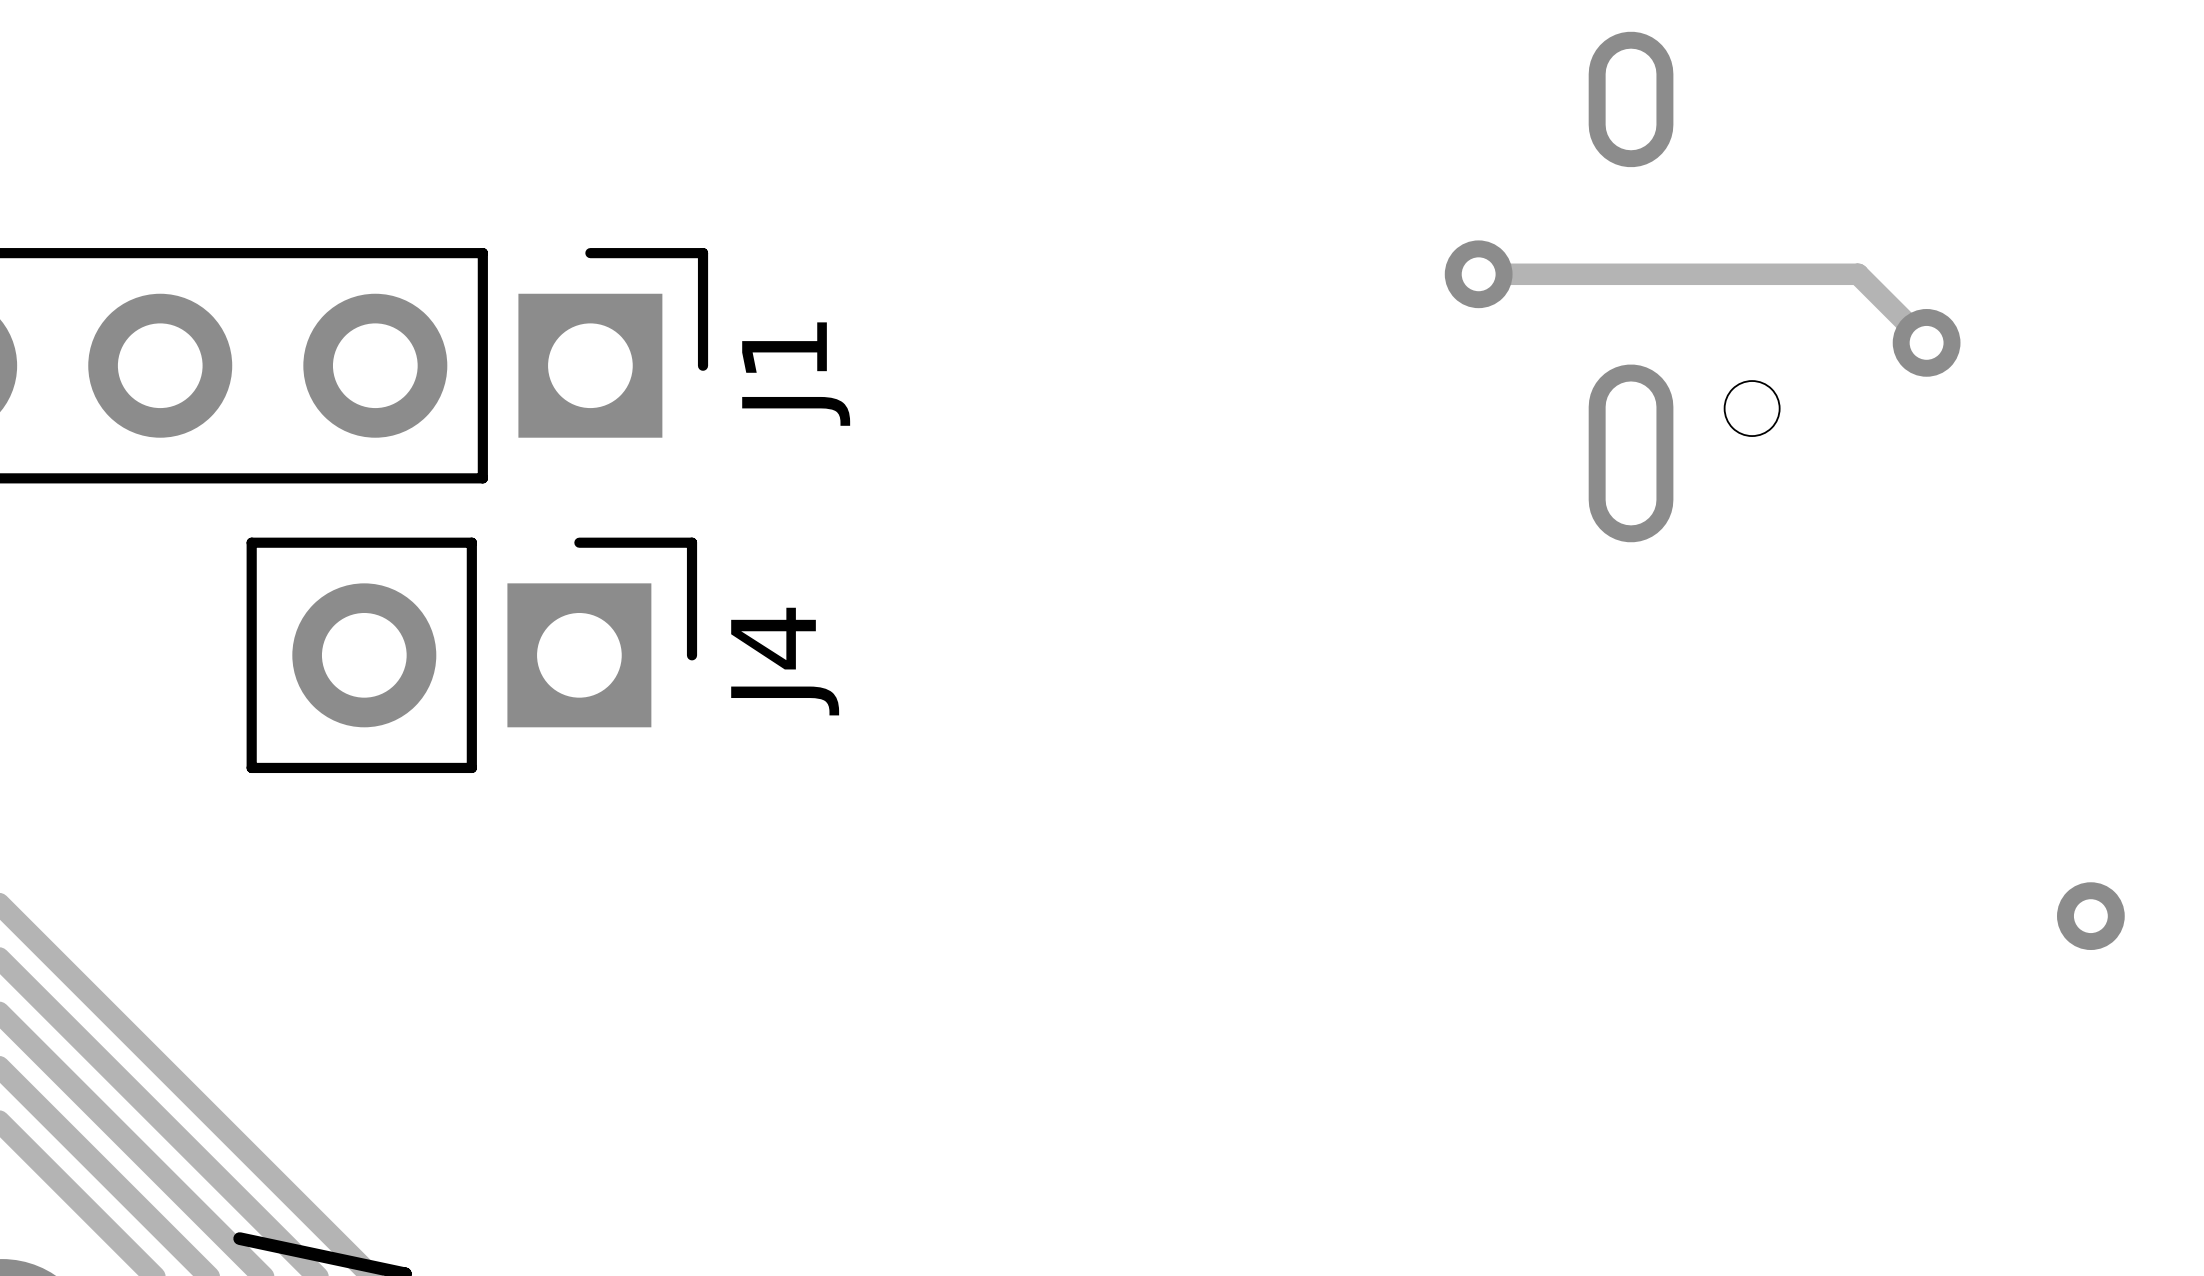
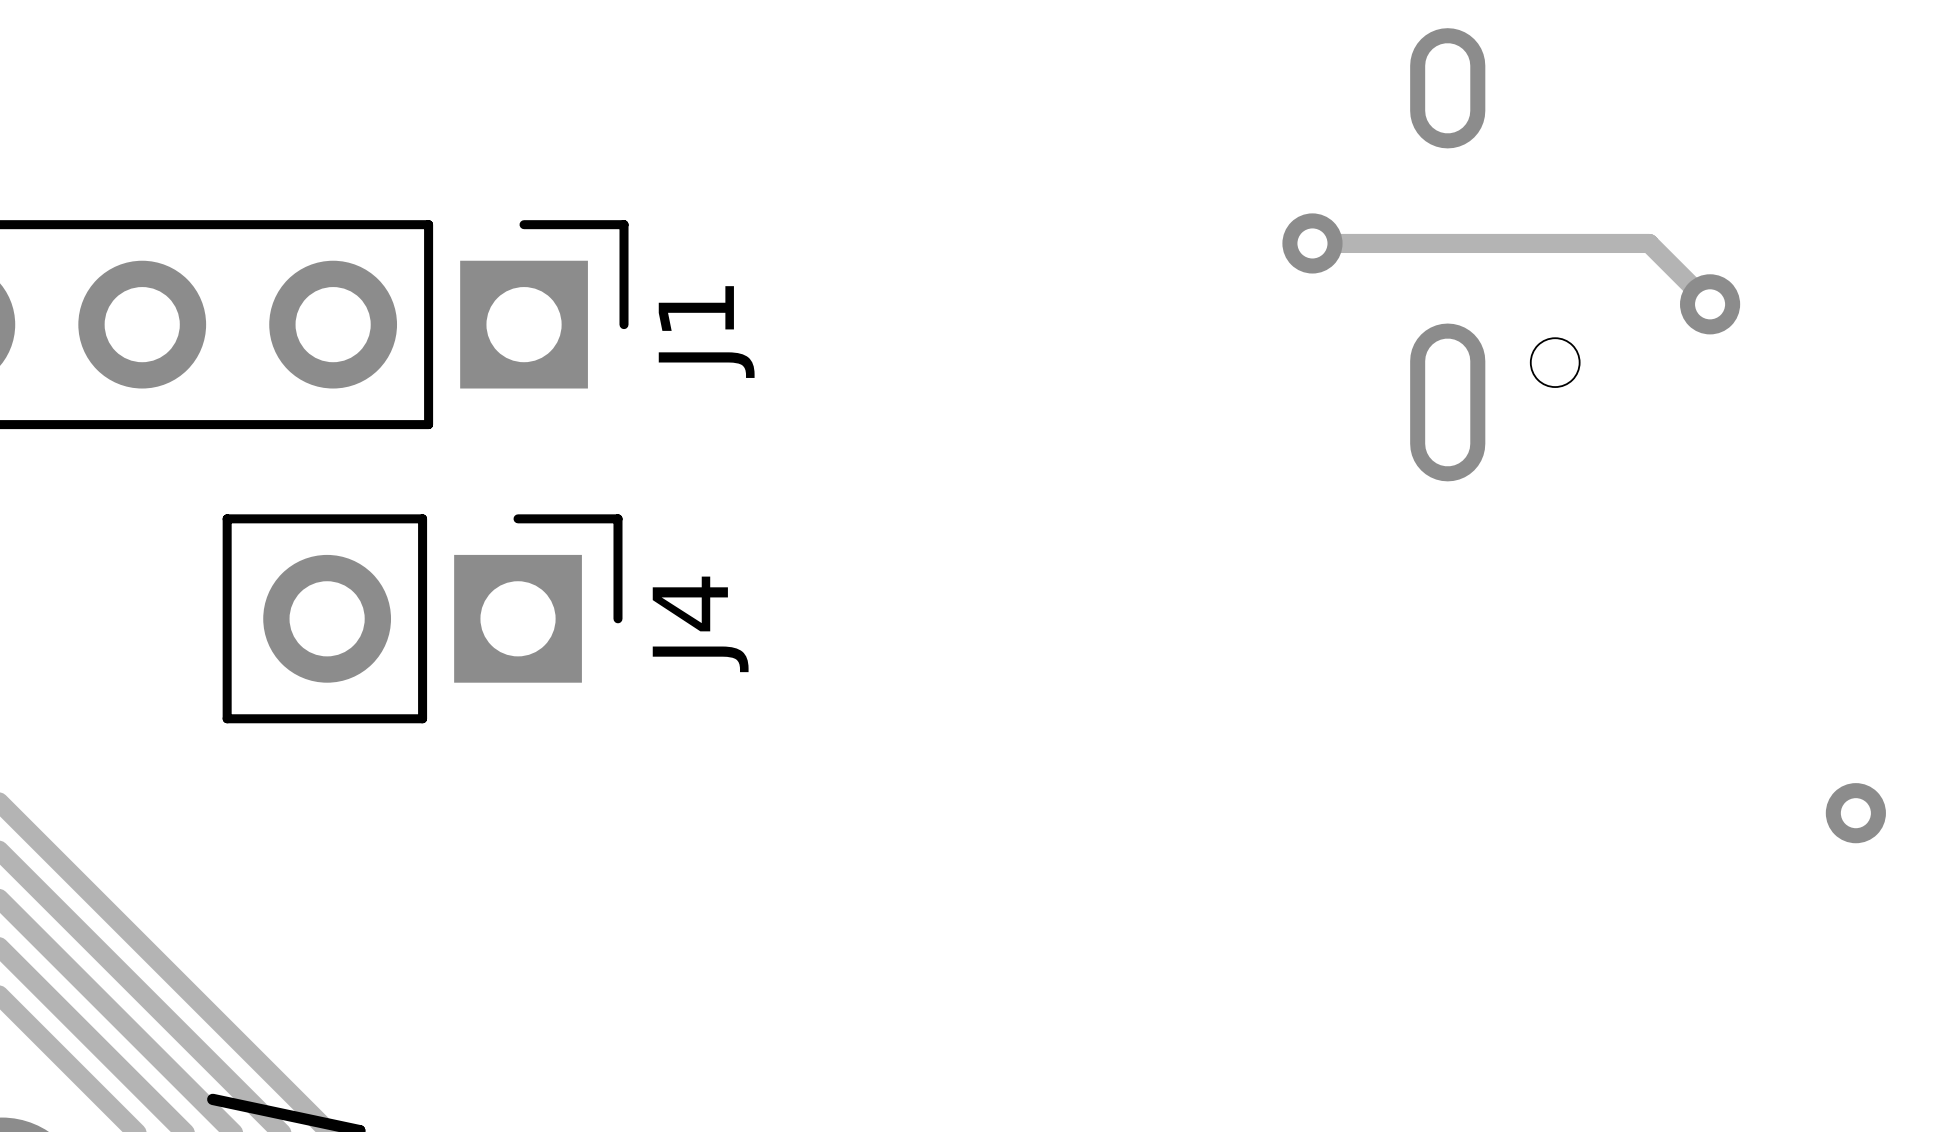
J4 position: (471, 655) -> (422, 618)

